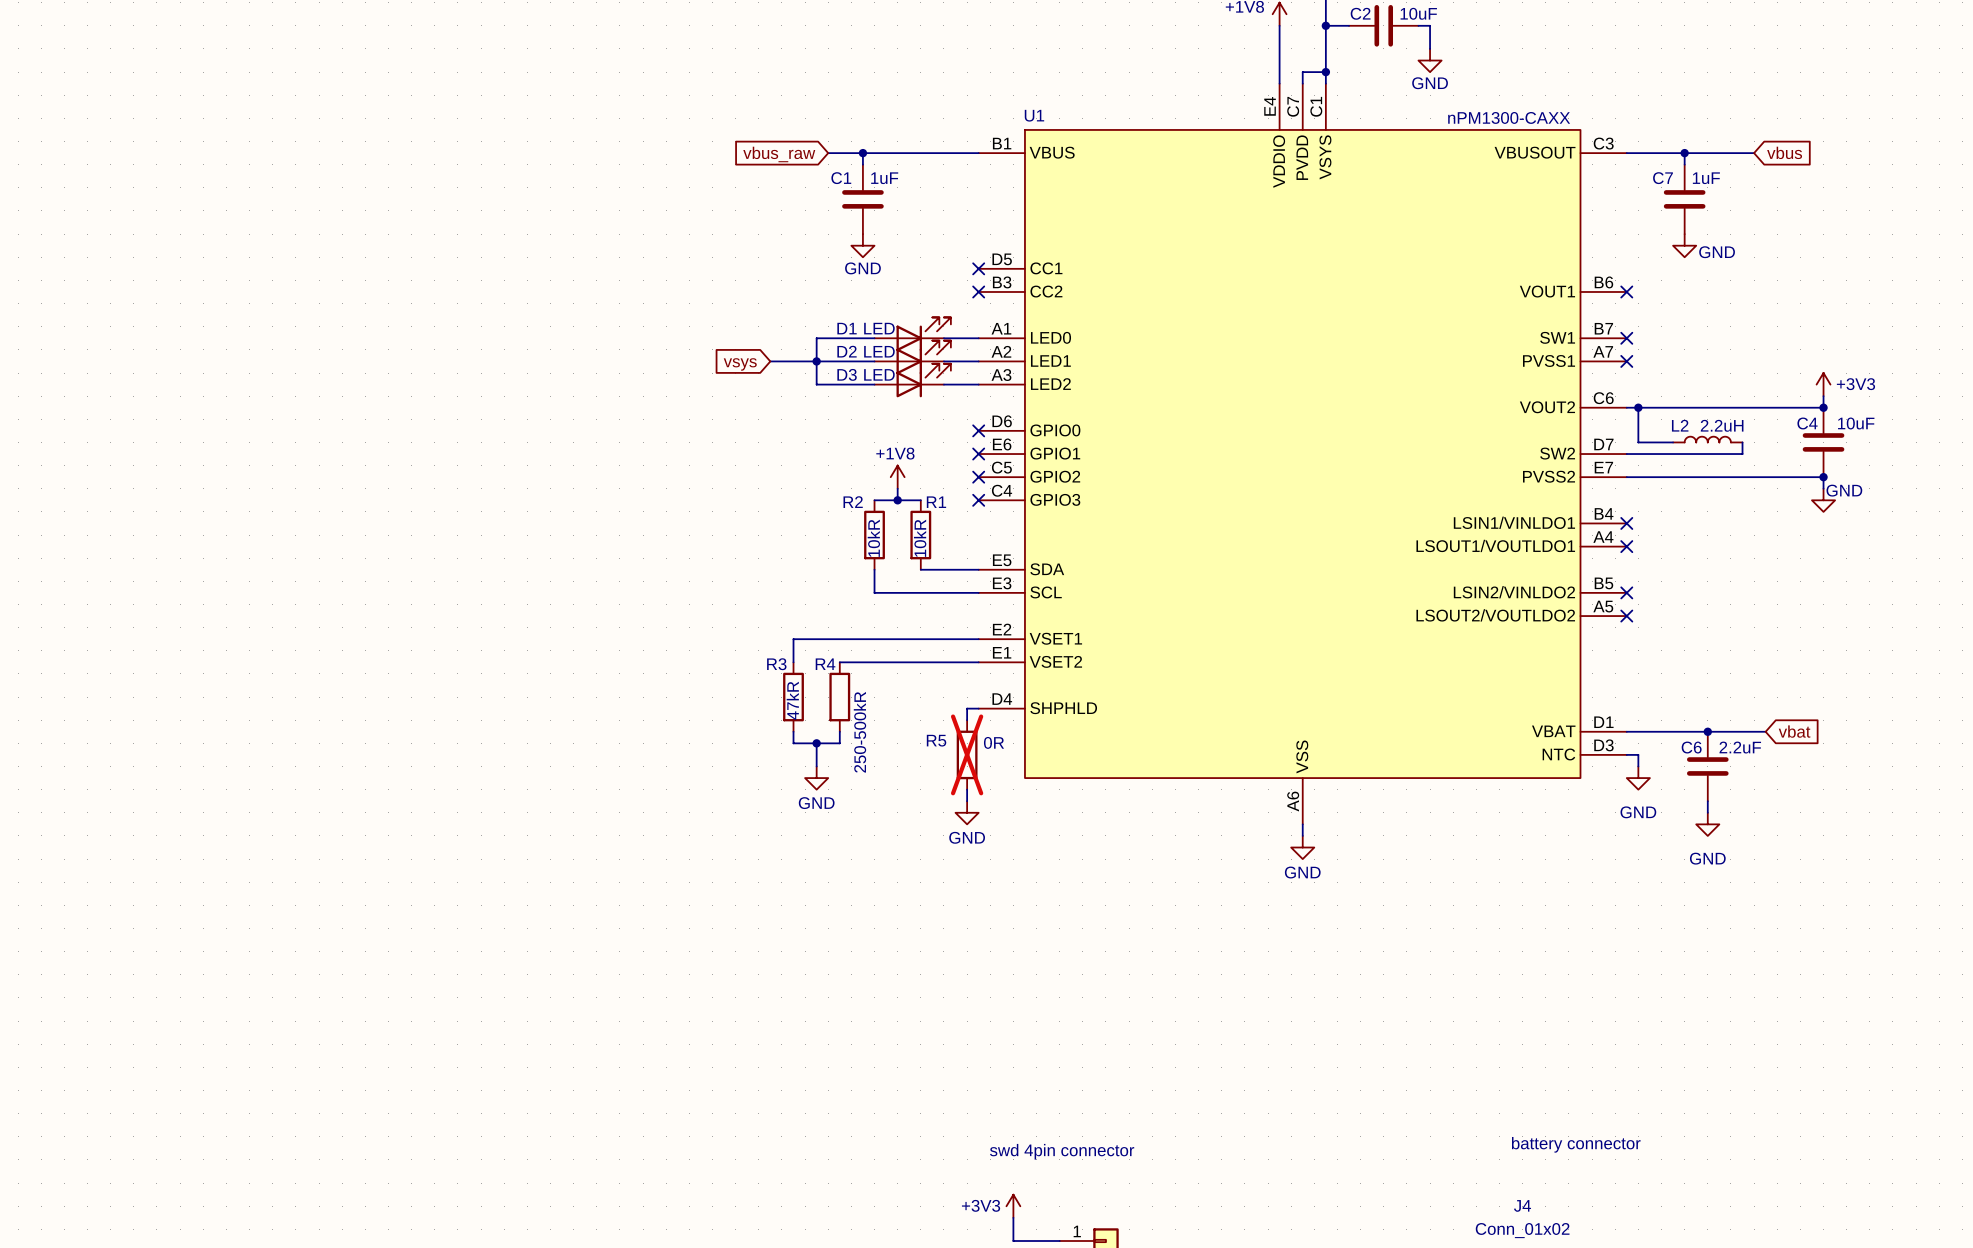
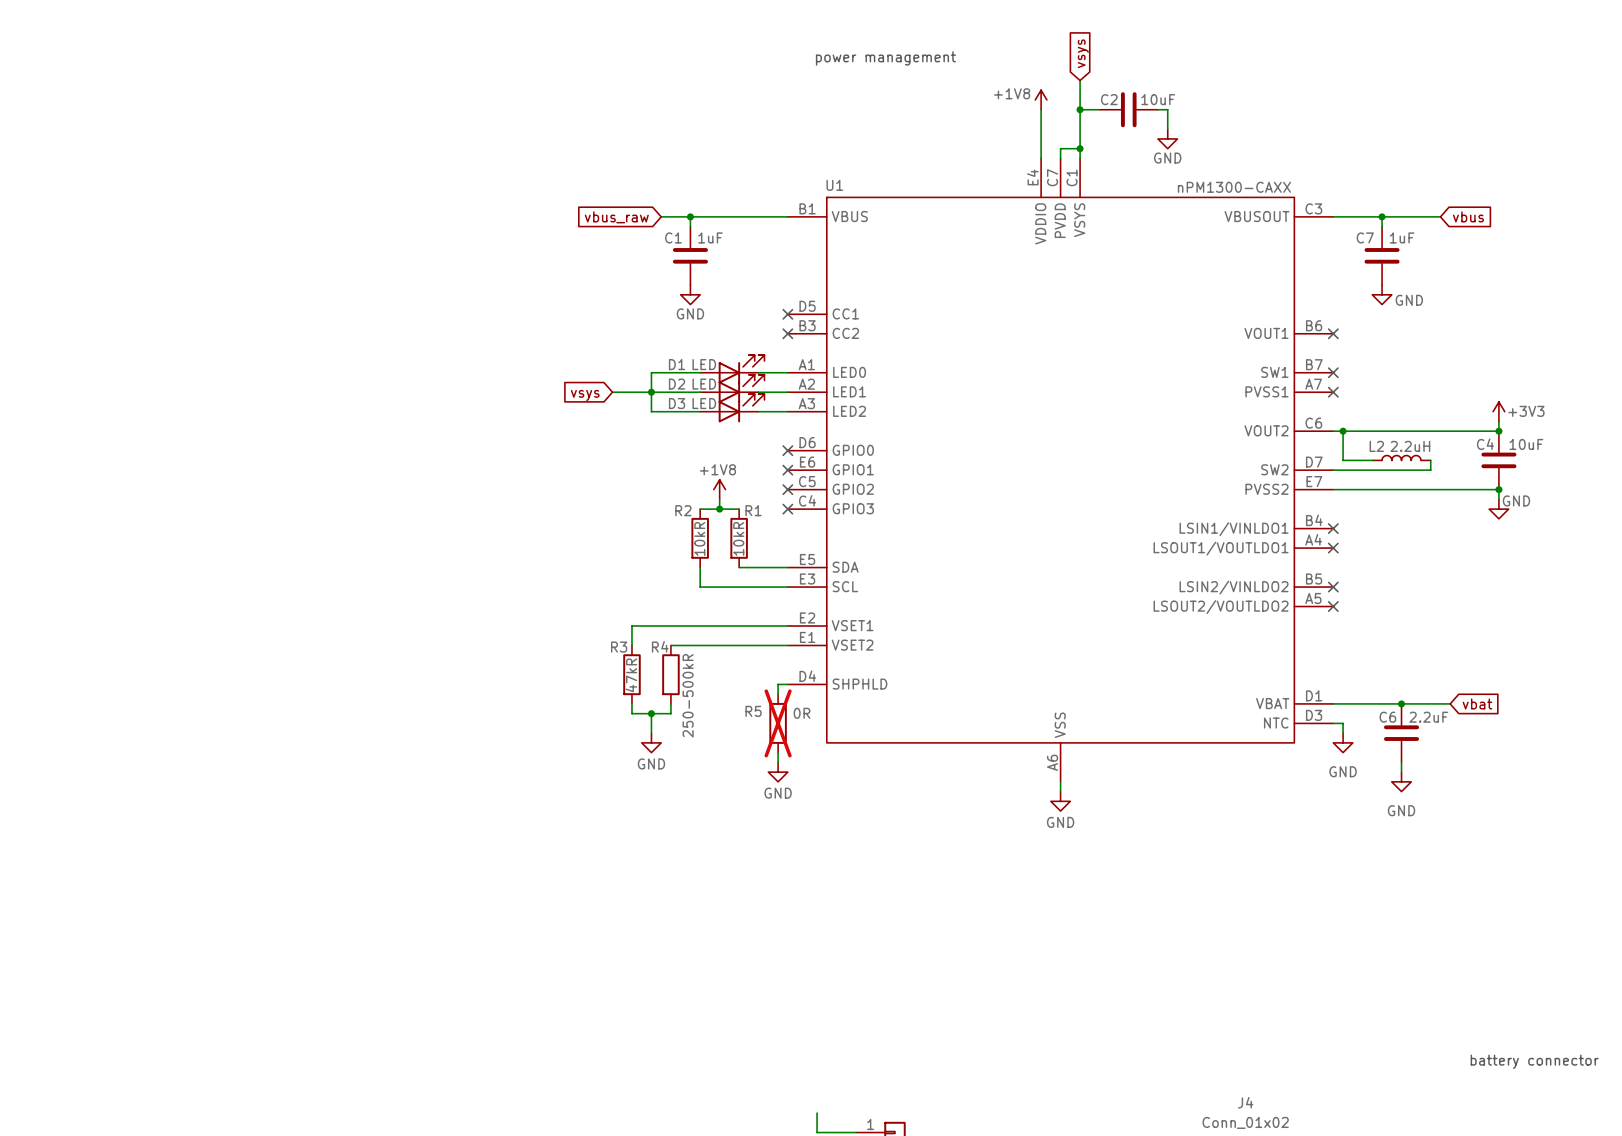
text: battery connector (1576, 1144) -> none
text: swd 4pin connector (1062, 1151) -> none
text: none -> battery connector (1534, 1061)
power symbol: +3V3 (1013, 1206) -> none

